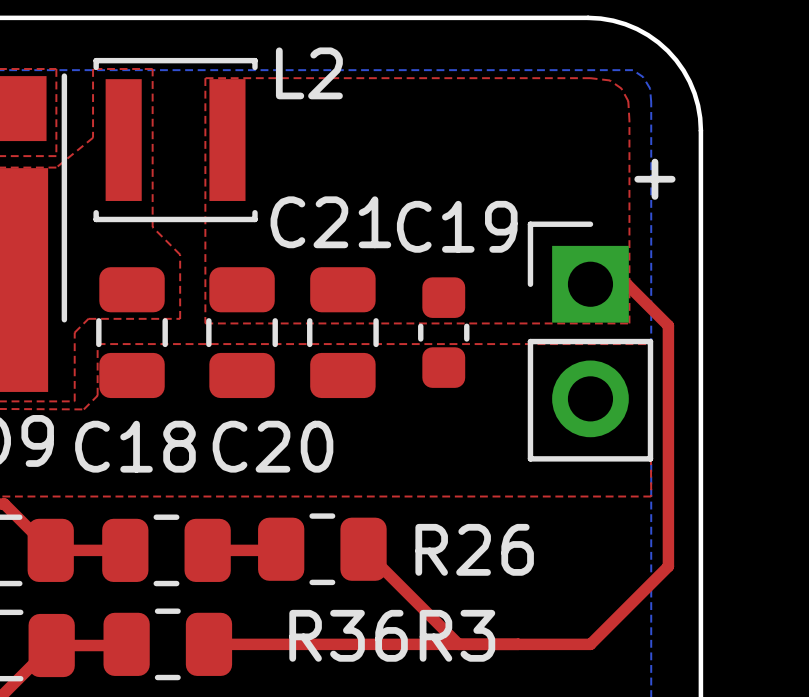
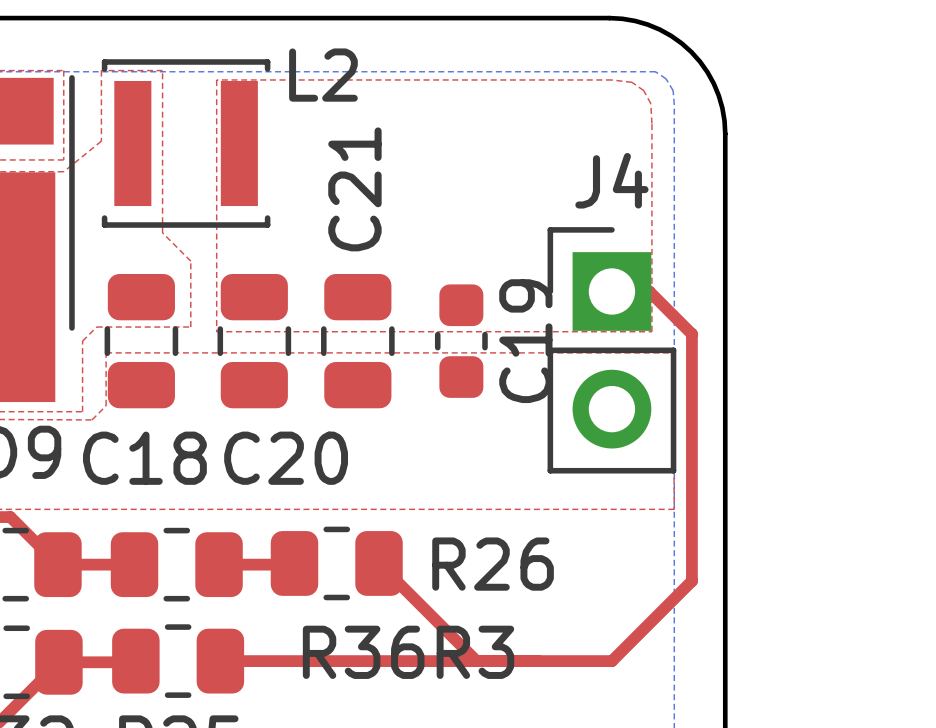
J4 name: none -> J4 (611, 180)
text: + (654, 179) -> none
C21 name rotation: 0° (330, 222) -> 90° counterclockwise (354, 189)
C19 name rotation: 0° (457, 226) -> 90° counterclockwise (525, 341)

